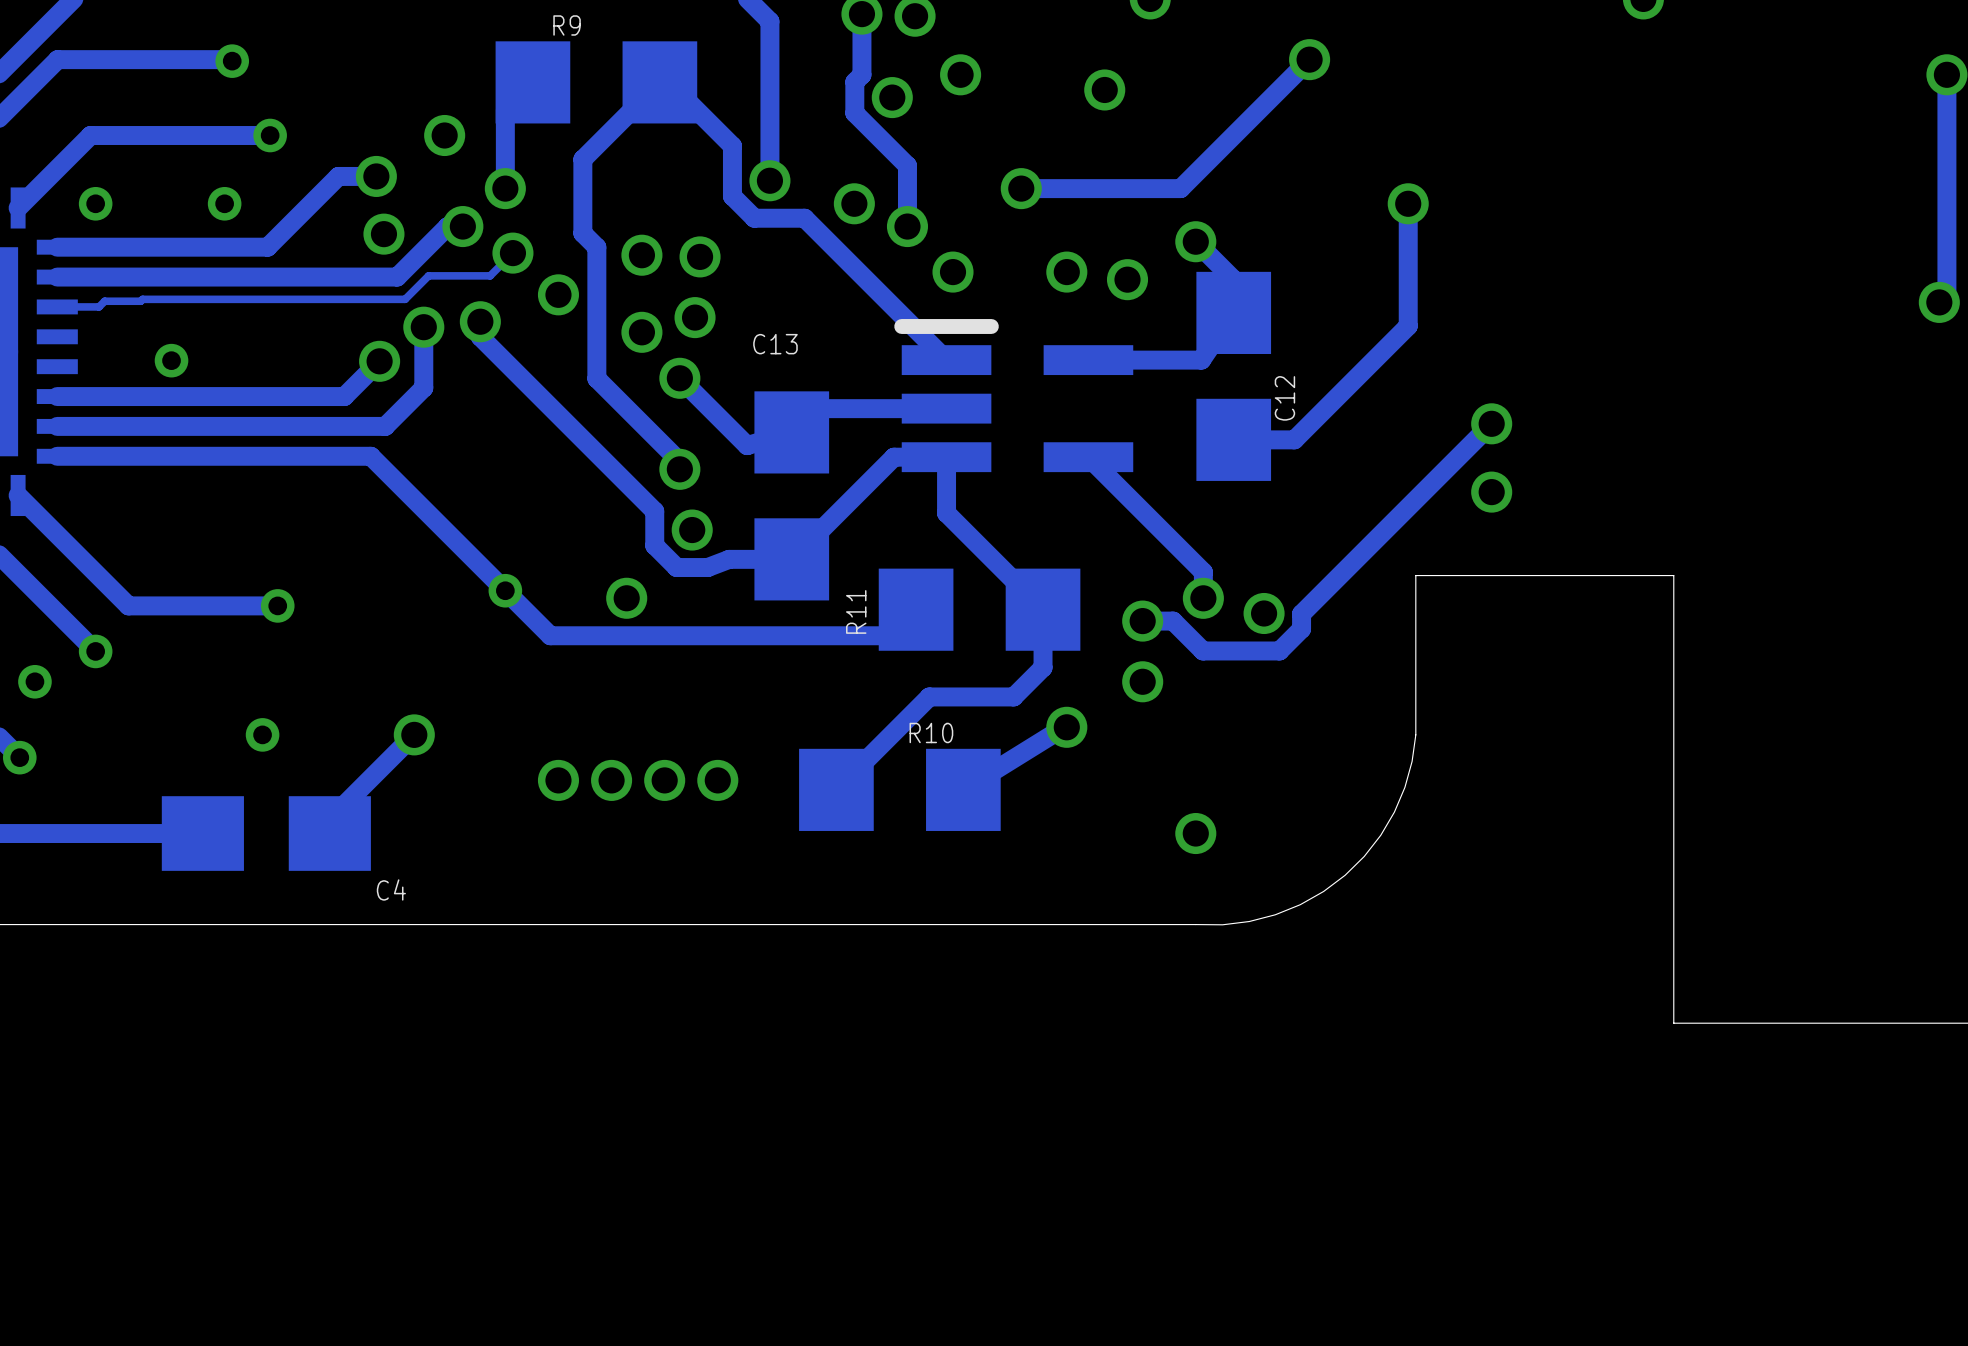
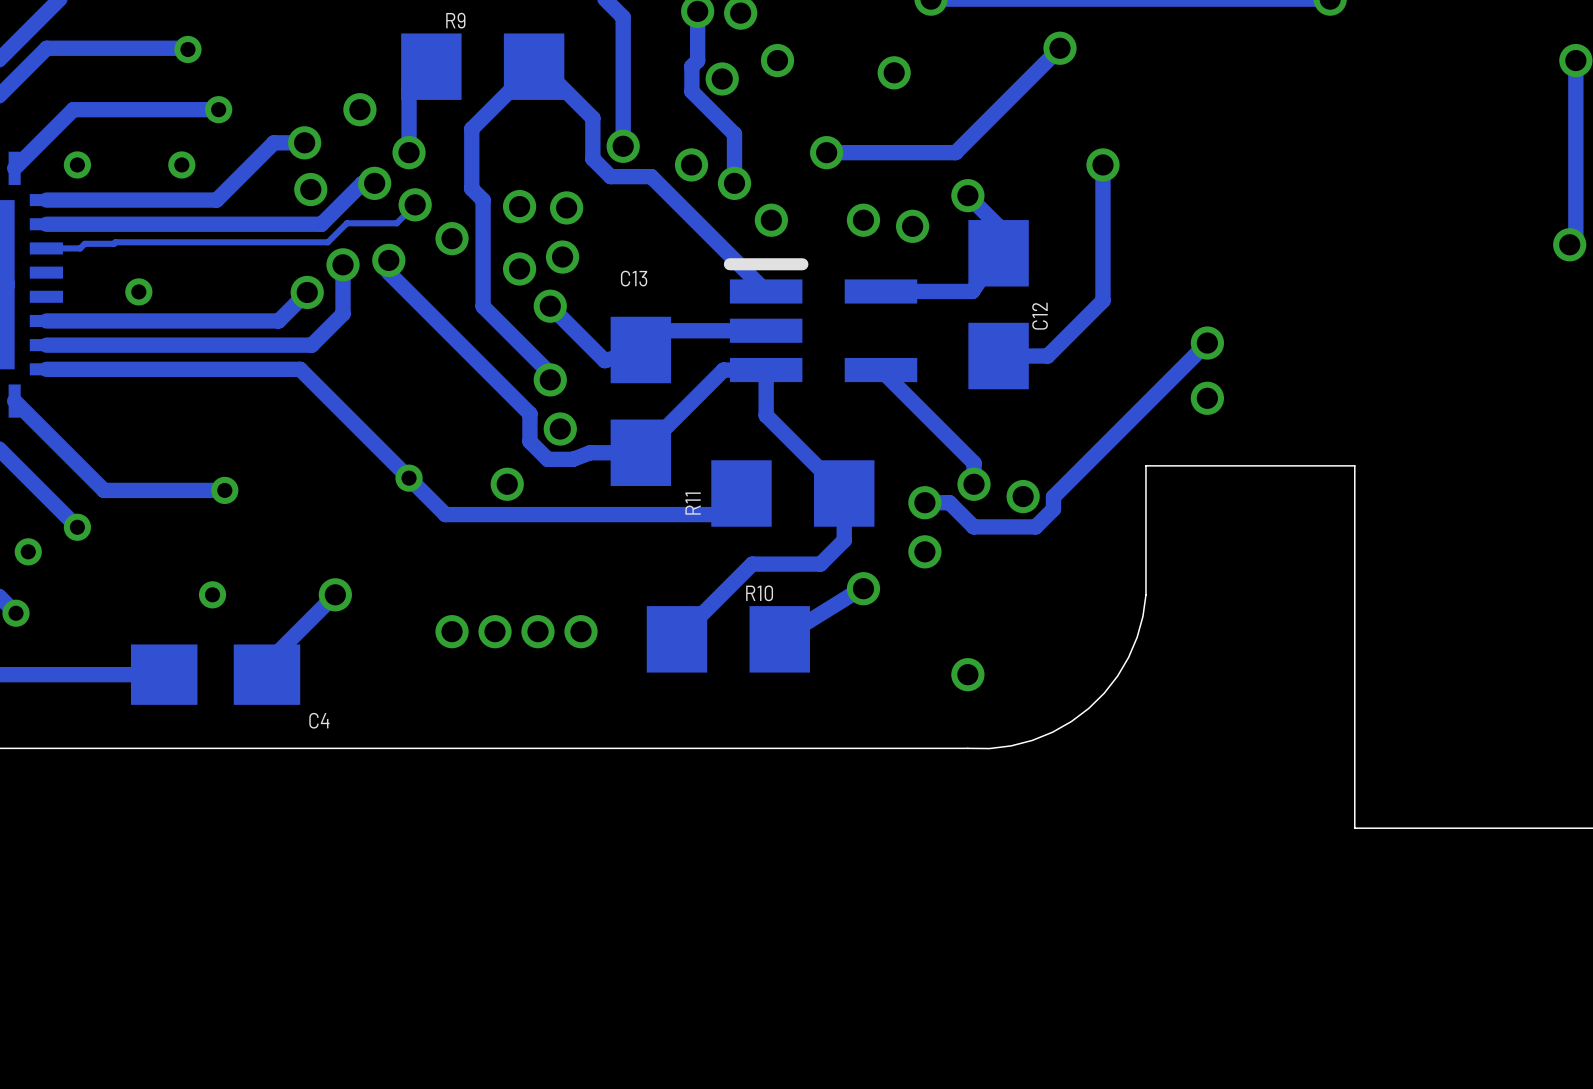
track: (1408, 203) (1408, 326) (1362, 371) -> (1102, 164) (1102, 300)
via position: (1408, 203) -> (1102, 164)

